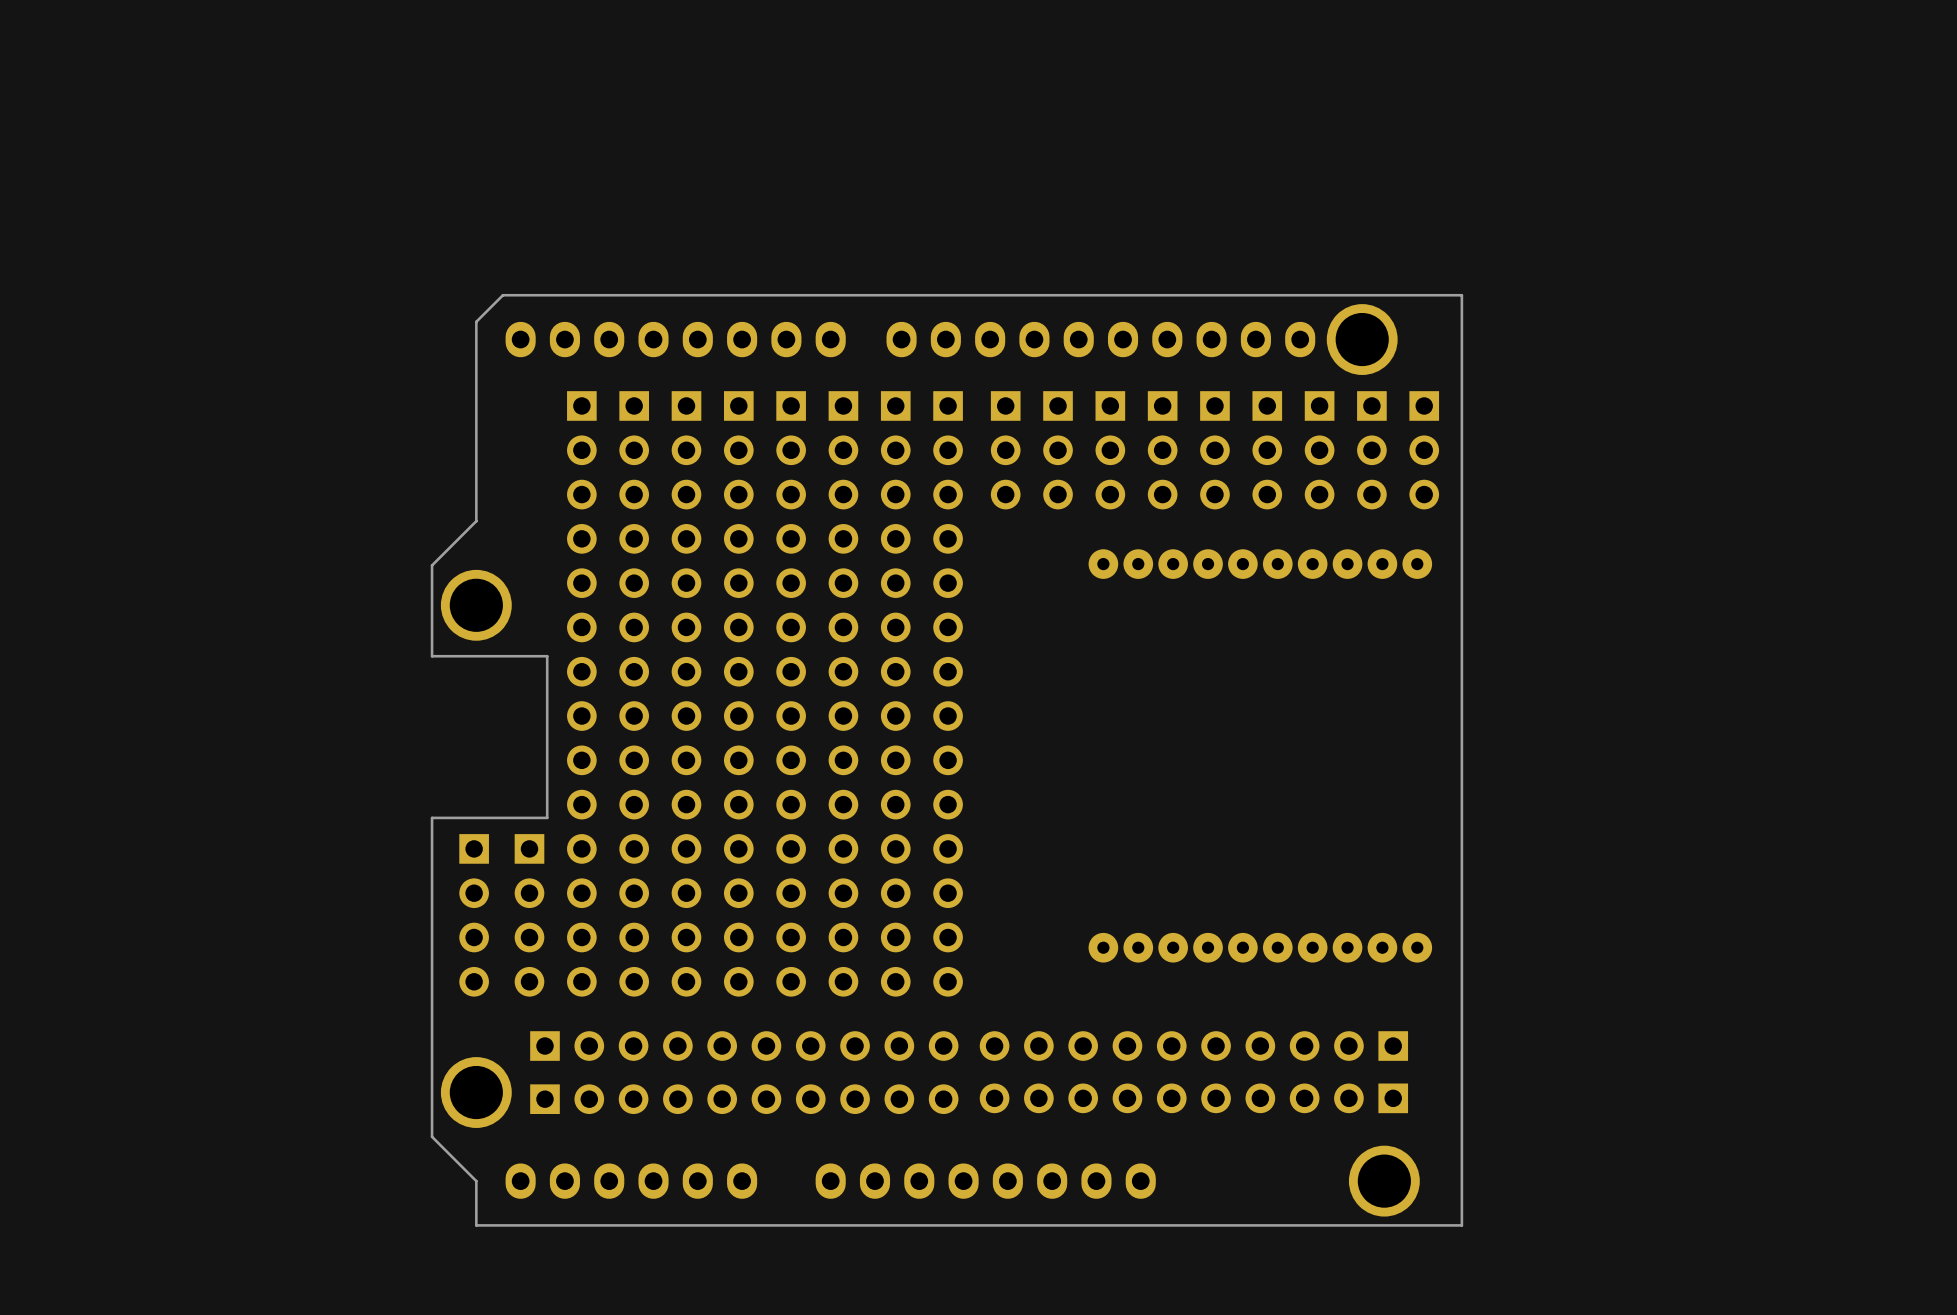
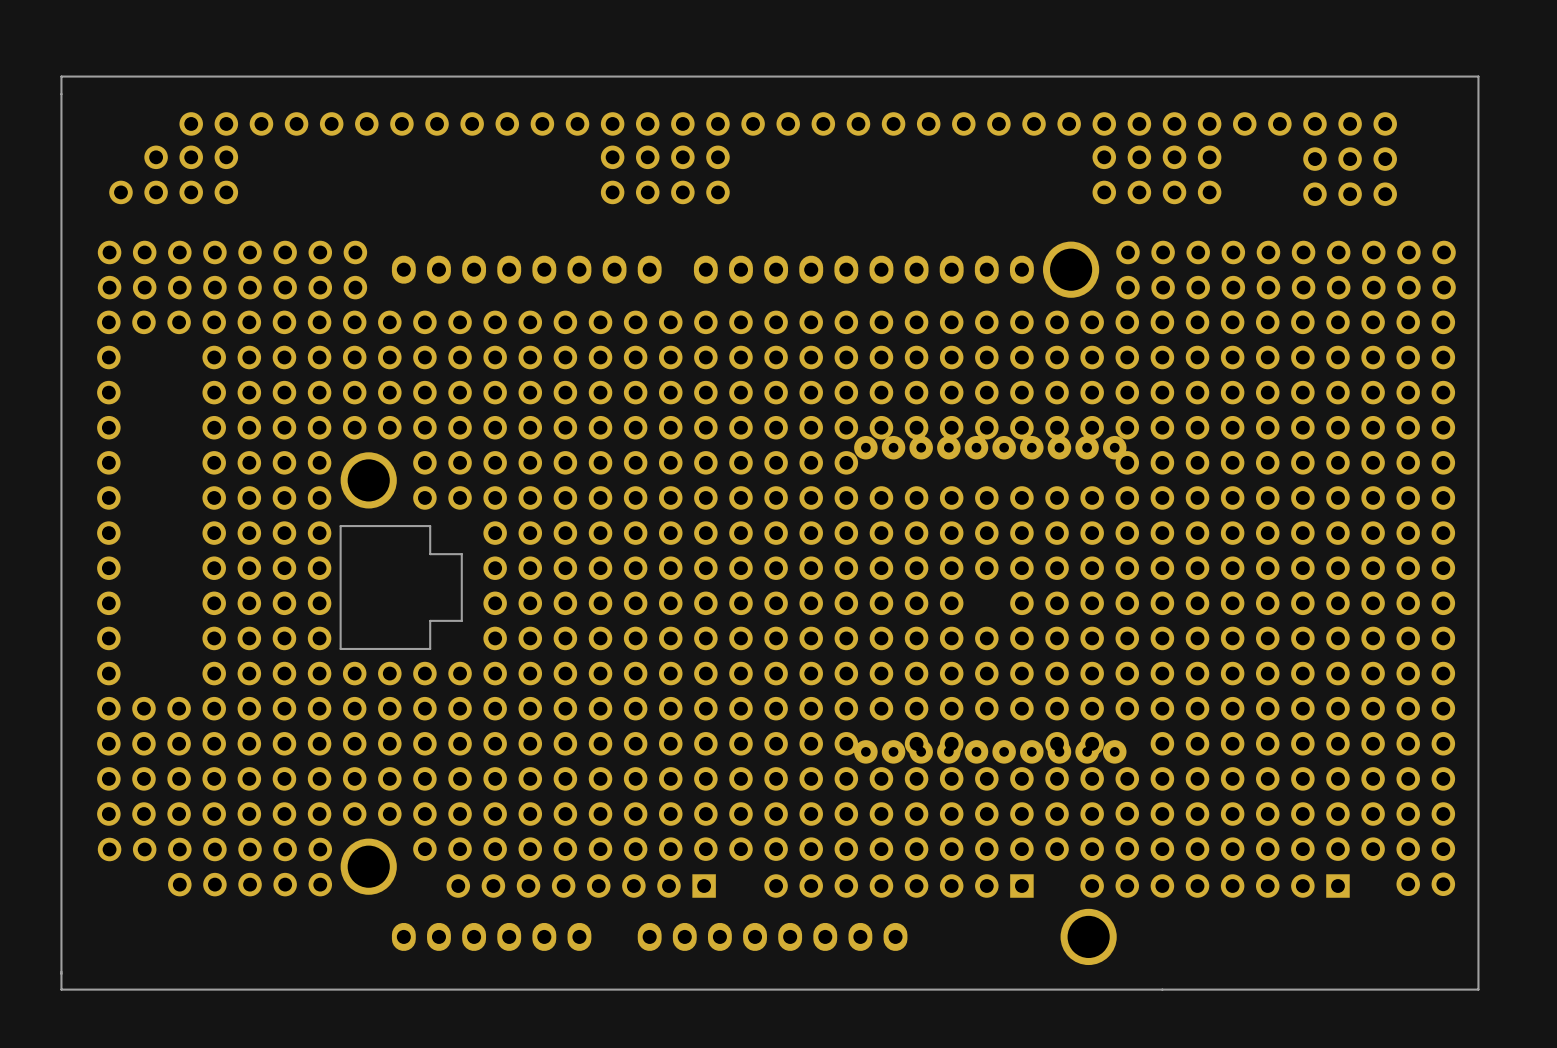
board edge: none -> (1478, 76) (1478, 989) (61, 989) (61, 76) (1478, 76)
part: none -> (191, 123)
part: none -> (226, 123)
part: none -> (261, 123)
part: none -> (296, 123)
part: none -> (331, 123)
part: none -> (366, 123)
part: none -> (401, 123)
part: none -> (437, 123)
part: none -> (472, 123)
part: none -> (507, 123)
part: none -> (542, 123)
part: none -> (577, 123)
part: none -> (612, 123)
part: none -> (647, 123)
part: none -> (682, 123)
part: none -> (717, 123)
part: none -> (753, 123)
part: none -> (788, 123)
part: none -> (823, 123)
part: none -> (858, 123)
part: none -> (893, 123)
part: none -> (928, 123)
part: none -> (963, 123)
part: none -> (998, 123)
part: none -> (1034, 123)
part: none -> (1069, 123)
part: none -> (1104, 123)
part: none -> (1139, 123)
part: none -> (1174, 123)
part: none -> (1209, 123)
part: none -> (1244, 123)
part: none -> (1279, 123)
part: none -> (1314, 123)
part: none -> (1350, 123)
part: none -> (1385, 123)
part: none -> (156, 157)
part: none -> (191, 157)
part: none -> (226, 157)
part: none -> (612, 157)
part: none -> (647, 157)
part: none -> (682, 157)
part: none -> (717, 157)
part: none -> (1104, 157)
part: none -> (1139, 157)
part: none -> (1174, 157)
part: none -> (1209, 157)
part: none -> (1314, 159)
part: none -> (1350, 159)
part: none -> (1385, 159)
part: none -> (120, 192)
part: none -> (156, 192)
part: none -> (191, 192)
part: none -> (226, 192)
part: none -> (612, 192)
part: none -> (647, 192)
part: none -> (682, 192)
part: none -> (717, 192)
part: none -> (1104, 192)
part: none -> (1139, 192)
part: none -> (1174, 192)
part: none -> (1209, 192)
part: none -> (1314, 194)
part: none -> (1350, 194)
part: none -> (1385, 194)
part: none -> (109, 252)
part: none -> (144, 252)
part: none -> (179, 252)
part: none -> (214, 252)
part: none -> (250, 252)
part: none -> (285, 252)
part: none -> (320, 252)
part: none -> (355, 252)
part: none -> (1127, 252)
part: none -> (1163, 252)
part: none -> (1198, 252)
part: none -> (1233, 252)
part: none -> (1268, 252)
part: none -> (1303, 252)
part: none -> (1338, 252)
part: none -> (1373, 252)
part: none -> (1408, 252)
part: none -> (1444, 252)
part: none -> (109, 287)
part: none -> (144, 287)
part: none -> (179, 287)
part: none -> (214, 287)
part: none -> (250, 287)
part: none -> (285, 287)
part: none -> (320, 287)
part: none -> (355, 287)
part: none -> (1127, 287)
part: none -> (1163, 287)
part: none -> (1198, 287)
part: none -> (1233, 287)
part: none -> (1268, 287)
part: none -> (1303, 287)
part: none -> (1338, 287)
part: none -> (1373, 287)
part: none -> (1408, 287)
part: none -> (1444, 287)
part footprint: [1095, 391, 1126, 510] -> [869, 345, 894, 370]
part footprint: [1147, 391, 1178, 510] -> [904, 345, 929, 370]
part footprint: [1200, 391, 1230, 510] -> [939, 345, 964, 370]
part footprint: [1252, 391, 1283, 510] -> [975, 345, 999, 370]
part footprint: [1409, 391, 1440, 510] -> [1115, 345, 1140, 370]
part: none -> (108, 322)
part: none -> (143, 322)
part: none -> (179, 322)
part: none -> (214, 322)
part: none -> (249, 322)
part: none -> (284, 322)
part: none -> (319, 322)
part: none -> (354, 322)
part: none -> (389, 322)
part: none -> (424, 322)
part: none -> (460, 322)
part: none -> (495, 322)
part: none -> (530, 322)
part: none -> (565, 322)
part: none -> (600, 322)
part: none -> (635, 322)
part: none -> (670, 322)
part: none -> (705, 322)
part: none -> (740, 322)
part: none -> (776, 322)
part: none -> (811, 322)
part: none -> (846, 322)
part: none -> (881, 322)
part: none -> (916, 322)
part: none -> (951, 322)
part: none -> (986, 322)
part: none -> (1021, 322)
part: none -> (1057, 322)
part: none -> (1092, 322)
part: none -> (1127, 322)
part: none -> (1162, 322)
part: none -> (1197, 322)
part: none -> (1232, 322)
part: none -> (1267, 322)
part: none -> (1302, 322)
part: none -> (1337, 322)
part: none -> (1373, 322)
part: none -> (1408, 322)
part: none -> (1443, 322)
part: none -> (108, 357)
part: none -> (214, 357)
part: none -> (249, 357)
part: none -> (284, 357)
part: none -> (319, 357)
part: none -> (354, 357)
part: none -> (389, 357)
part: none -> (424, 357)
part: none -> (460, 357)
part: none -> (495, 357)
part: none -> (530, 357)
part: none -> (565, 357)
part: none -> (600, 357)
part: none -> (635, 357)
part: none -> (670, 357)
part: none -> (705, 357)
part: none -> (740, 357)
part: none -> (776, 357)
part: (1005, 450) -> none
part: none -> (811, 357)
part: (1058, 450) -> none
part: none -> (846, 357)
part: none -> (1021, 357)
part: (1319, 450) -> none
part: none -> (1057, 357)
part: (1371, 450) -> none
part: none -> (1092, 357)
part: none -> (1162, 357)
part: none -> (1197, 357)
part: none -> (1232, 357)
part: none -> (1267, 357)
part: none -> (1302, 357)
part: none -> (1337, 357)
part: none -> (1373, 357)
part: none -> (1408, 357)
part: none -> (1443, 357)
part: none -> (108, 392)
part: none -> (214, 392)
part: none -> (249, 392)
part: none -> (284, 392)
part: none -> (319, 392)
part: none -> (354, 392)
part: none -> (389, 392)
part: none -> (424, 392)
part: none -> (460, 392)
part: none -> (495, 392)
part: none -> (530, 392)
part: none -> (565, 392)
part: none -> (600, 392)
part: none -> (635, 392)
part: none -> (670, 392)
part: none -> (705, 392)
part: none -> (740, 392)
part: none -> (776, 392)
part: none -> (811, 392)
part: none -> (846, 392)
part: none -> (881, 392)
part: none -> (916, 392)
part: none -> (951, 392)
part: none -> (986, 392)
part: none -> (1021, 392)
part: none -> (1057, 392)
part: none -> (1092, 392)
part: none -> (1127, 392)
part: none -> (1162, 392)
part: none -> (1197, 392)
part: none -> (1232, 392)
part: none -> (1267, 392)
part: none -> (1302, 392)
part: none -> (1337, 392)
part: none -> (1373, 392)
part: none -> (1408, 392)
part: none -> (1443, 392)
part: none -> (108, 427)
part: none -> (214, 427)
part: none -> (249, 427)
part: none -> (284, 427)
part: none -> (319, 427)
part: none -> (354, 427)
part: none -> (389, 427)
part: none -> (424, 427)
part: none -> (460, 427)
part: none -> (495, 427)
part: none -> (530, 427)
part: none -> (565, 427)
part: none -> (600, 427)
part: none -> (635, 427)
part: none -> (670, 427)
part: none -> (705, 427)
part: none -> (740, 427)
part: none -> (776, 427)
part: none -> (811, 427)
part: none -> (846, 427)
part: none -> (881, 427)
part: none -> (916, 427)
part: none -> (951, 427)
part: none -> (986, 427)
part: none -> (1021, 427)
part: none -> (1057, 427)
part: none -> (1092, 427)
part: none -> (1127, 427)
part: none -> (1162, 427)
part: none -> (1197, 427)
part: none -> (1232, 427)
part: none -> (1267, 427)
part: none -> (1302, 427)
part: none -> (1337, 427)
part: none -> (1373, 427)
part: none -> (1408, 427)
part: none -> (1443, 427)
part: none -> (108, 462)
part: none -> (214, 462)
part: none -> (249, 462)
part: none -> (284, 462)
part: none -> (319, 462)
part: none -> (424, 462)
part: none -> (460, 462)
part: none -> (495, 462)
part: none -> (530, 462)
part: none -> (565, 462)
part: none -> (600, 462)
part: none -> (635, 462)
part: none -> (670, 462)
part: none -> (705, 462)
part: none -> (740, 462)
part: none -> (776, 462)
part: none -> (811, 462)
part: none -> (846, 462)
part: none -> (1127, 462)
part: none -> (1162, 462)
part: none -> (1197, 462)
part: none -> (1232, 462)
part: none -> (1267, 462)
part: none -> (1302, 462)
part: none -> (1337, 462)
part: none -> (1373, 462)
part: none -> (1408, 462)
part: none -> (1443, 462)
part: none -> (108, 497)
part: none -> (214, 497)
part: none -> (249, 497)
part: none -> (284, 497)
part: none -> (319, 497)
part: none -> (424, 497)
part: none -> (460, 497)
part: none -> (495, 497)
part: none -> (530, 497)
part: none -> (565, 497)
part: none -> (600, 497)
part: none -> (635, 497)
part: none -> (670, 497)
part: none -> (705, 497)
part: none -> (740, 497)
part: none -> (776, 497)
part: none -> (811, 497)
part: none -> (846, 497)
part: none -> (881, 497)
part: none -> (916, 497)
part: none -> (951, 497)
part: none -> (986, 497)
part: none -> (1021, 497)
part: none -> (1057, 497)
part: none -> (1092, 497)
part: none -> (1127, 497)
part: none -> (1162, 497)
part: none -> (1197, 497)
part: none -> (1232, 497)
part: none -> (1267, 497)
part: none -> (1302, 497)
part: none -> (1337, 497)
part: none -> (1373, 497)
part: none -> (1408, 497)
part: none -> (1443, 497)
part: none -> (108, 533)
part: none -> (214, 533)
part: none -> (249, 533)
part: none -> (284, 533)
part: none -> (319, 533)
part: none -> (495, 533)
part: none -> (530, 533)
part: none -> (565, 533)
part: none -> (600, 533)
part: none -> (635, 533)
part: none -> (670, 533)
part: none -> (705, 533)
part: none -> (740, 533)
part: none -> (776, 533)
part: none -> (811, 533)
part: none -> (846, 533)
part: none -> (881, 533)
part: none -> (916, 533)
part: none -> (951, 533)
part: none -> (986, 533)
part: none -> (1021, 533)
part: none -> (1057, 533)
part: none -> (1092, 533)
part: none -> (1127, 533)
part: none -> (1162, 533)
part: none -> (1197, 533)
part: none -> (1232, 533)
part: none -> (1267, 533)
part: none -> (1302, 533)
part: none -> (1337, 533)
part: none -> (1373, 533)
part: none -> (1408, 533)
part: none -> (1443, 533)
part: (581, 693) -> none
part: (634, 693) -> none
part: (686, 693) -> none
part: (738, 693) -> none
part: (791, 693) -> none
part: (843, 693) -> none
part: (895, 693) -> none
part: (948, 693) -> none
part: none -> (108, 568)
part: none -> (214, 568)
part: none -> (249, 568)
part: none -> (284, 568)
part: none -> (319, 568)
part: none -> (495, 568)
part: none -> (530, 568)
part: none -> (565, 568)
part: none -> (600, 568)
part: none -> (635, 568)
part: none -> (670, 568)
part: none -> (705, 568)
part: none -> (740, 568)
part: none -> (776, 568)
part: none -> (811, 568)
part: none -> (846, 568)
part: none -> (881, 568)
part: none -> (916, 568)
part: none -> (951, 568)
part: none -> (986, 568)
part: none -> (1021, 568)
part: none -> (1057, 568)
part: none -> (1092, 568)
part: none -> (1127, 568)
part: none -> (1162, 568)
part: none -> (1197, 568)
part: none -> (1232, 568)
part: none -> (1267, 568)
part: none -> (1302, 568)
part: none -> (1337, 568)
part: none -> (1373, 568)
part: none -> (1408, 568)
part: none -> (1443, 568)
part: none -> (108, 603)
part: none -> (214, 603)
part: none -> (249, 603)
part: none -> (284, 603)
part: none -> (319, 603)
part: none -> (495, 603)
part: none -> (530, 603)
part: none -> (565, 603)
part: none -> (600, 603)
part: none -> (635, 603)
part: none -> (670, 603)
part: none -> (705, 603)
part: none -> (740, 603)
part: none -> (776, 603)
part: none -> (811, 603)
part: none -> (846, 603)
part: none -> (881, 603)
part: none -> (916, 603)
part: none -> (951, 603)
part: none -> (1021, 603)
part: none -> (1057, 603)
part: none -> (1092, 603)
part: none -> (1127, 603)
part: none -> (1162, 603)
part: none -> (1197, 603)
part: none -> (1232, 603)
part: none -> (1267, 603)
part: none -> (1302, 603)
part: none -> (1337, 603)
part: none -> (1373, 603)
part: none -> (1408, 603)
part: none -> (1443, 603)
part: none -> (108, 638)
part: none -> (214, 638)
part: none -> (249, 638)
part: none -> (284, 638)
part: none -> (319, 638)
part: none -> (495, 638)
part: none -> (530, 638)
part: none -> (565, 638)
part: none -> (600, 638)
part: none -> (635, 638)
part: none -> (670, 638)
part: none -> (705, 638)
part: none -> (740, 638)
part: none -> (776, 638)
part: none -> (811, 638)
part: none -> (846, 638)
part: none -> (881, 638)
part: none -> (916, 638)
part: none -> (951, 638)
part: none -> (986, 638)
part: none -> (1021, 638)
part: none -> (1057, 638)
part: none -> (1092, 638)
part: none -> (1127, 638)
part: none -> (1162, 638)
part: none -> (1197, 638)
part: none -> (1232, 638)
part: none -> (1267, 638)
part: none -> (1302, 638)
part: none -> (1337, 638)
part: none -> (1373, 638)
part: none -> (1408, 638)
part: none -> (1443, 638)
board edge: (547, 817) (547, 656) (432, 656) (432, 565) (476, 521) (476, 321) (502, 295) (1461, 295) (1461, 1225) (476, 1225) (476, 1181) (432, 1136) (432, 817) (440, 817) -> (424, 648) (430, 648) (430, 620) (461, 620) (461, 554) (430, 554) (430, 526) (340, 526) (340, 648)
part: none -> (108, 673)
part: none -> (214, 673)
part: none -> (249, 673)
part: none -> (284, 673)
part: none -> (319, 673)
part: none -> (354, 673)
part: none -> (389, 673)
part: none -> (424, 673)
part: none -> (460, 673)
part: none -> (495, 673)
part: none -> (530, 673)
part: none -> (565, 673)
part: none -> (600, 673)
part: none -> (635, 673)
part: none -> (670, 673)
part: none -> (705, 673)
part: none -> (740, 673)
part: none -> (776, 673)
part: none -> (811, 673)
part: none -> (846, 673)
part: none -> (881, 673)
part: none -> (916, 673)
part: none -> (951, 673)
part: none -> (986, 673)
part: none -> (1021, 673)
part: none -> (1057, 673)
part: none -> (1092, 673)
part: none -> (1127, 673)
part: none -> (1162, 673)
part: none -> (1197, 673)
part: none -> (1232, 673)
part: none -> (1267, 673)
part: none -> (1302, 673)
part: none -> (1337, 673)
part: none -> (1373, 673)
part: none -> (1408, 673)
part: none -> (1443, 673)
part: none -> (108, 708)
part: none -> (143, 708)
part: none -> (179, 708)
part: none -> (214, 708)
part: none -> (249, 708)
part: none -> (284, 708)
part: none -> (319, 708)
part: none -> (354, 708)
part: none -> (389, 708)
part: none -> (424, 708)
part: none -> (460, 708)
part: none -> (495, 708)
part: none -> (530, 708)
part: none -> (565, 708)
part: none -> (600, 708)
part: none -> (635, 708)
part: none -> (670, 708)
part: none -> (705, 708)
part: none -> (740, 708)
part: none -> (776, 708)
part: none -> (811, 708)
part: none -> (846, 708)
part: none -> (881, 708)
part: none -> (916, 708)
part: none -> (951, 708)
part: none -> (986, 708)
part: none -> (1021, 708)
part: none -> (1057, 708)
part: none -> (1092, 708)
part: none -> (1127, 708)
part: none -> (1162, 708)
part: none -> (1197, 708)
part: none -> (1232, 708)
part: none -> (1267, 708)
part: none -> (1302, 708)
part: none -> (1337, 708)
part: none -> (1373, 708)
part: none -> (1408, 708)
part: none -> (1443, 708)
part: (474, 915) -> none
part: (529, 915) -> none
part: none -> (108, 743)
part: none -> (143, 743)
part: none -> (179, 743)
part: none -> (214, 743)
part: none -> (249, 743)
part: none -> (284, 743)
part: none -> (319, 743)
part: none -> (354, 743)
part: none -> (389, 743)
part: none -> (424, 743)
part: none -> (460, 743)
part: none -> (495, 743)
part: none -> (530, 743)
part: none -> (565, 743)
part: none -> (600, 743)
part: none -> (635, 743)
part: none -> (670, 743)
part: none -> (705, 743)
part: none -> (740, 743)
part: none -> (776, 743)
part: none -> (811, 743)
part: none -> (846, 743)
part: none -> (916, 743)
part: none -> (951, 743)
part: none -> (1057, 743)
part: none -> (1092, 743)
part: none -> (1162, 743)
part: none -> (1197, 743)
part: none -> (1232, 743)
part: none -> (1267, 743)
part: none -> (1302, 743)
part: none -> (1337, 743)
part: none -> (1373, 743)
part: none -> (1408, 743)
part: none -> (1443, 743)
part: none -> (108, 778)
part: none -> (143, 778)
part: none -> (179, 778)
part: none -> (214, 778)
part: none -> (249, 778)
part: none -> (284, 778)
part: none -> (319, 778)
part: none -> (354, 778)
part: none -> (389, 778)
part: none -> (424, 778)
part: none -> (460, 778)
part: none -> (495, 778)
part: none -> (530, 778)
part: none -> (565, 778)
part: none -> (600, 778)
part: none -> (635, 778)
part: none -> (670, 778)
part: none -> (705, 778)
part: none -> (740, 778)
part: none -> (776, 778)
part: none -> (811, 778)
part: none -> (846, 778)
part: none -> (881, 778)
part: none -> (916, 778)
part: none -> (951, 778)
part: none -> (986, 778)
part: none -> (1021, 778)
part: none -> (1057, 778)
part: none -> (1092, 778)
part: none -> (1127, 778)
part: none -> (1162, 778)
part: none -> (1197, 778)
part: none -> (1232, 778)
part: none -> (1267, 778)
part: none -> (1302, 778)
part: none -> (1337, 778)
part: none -> (1373, 778)
part: none -> (1408, 778)
part: none -> (1443, 778)
part: none -> (1127, 813)
part: none -> (108, 814)
part: none -> (143, 814)
part: none -> (179, 814)
part: none -> (214, 814)
part: none -> (249, 814)
part: none -> (284, 814)
part: none -> (319, 814)
part: none -> (354, 814)
part: none -> (389, 814)
part: none -> (424, 814)
part: none -> (460, 814)
part: none -> (495, 814)
part: none -> (530, 814)
part: none -> (565, 814)
part: none -> (600, 814)
part: none -> (635, 814)
part: none -> (670, 814)
part: none -> (705, 814)
part: none -> (740, 814)
part: none -> (776, 814)
part: none -> (811, 814)
part: none -> (846, 814)
part: none -> (881, 814)
part: none -> (916, 814)
part: none -> (951, 814)
part: none -> (986, 814)
part: none -> (1021, 814)
part: none -> (1057, 814)
part: none -> (1092, 814)
part: none -> (1162, 814)
part: none -> (1197, 814)
part: none -> (1232, 814)
part: none -> (1267, 814)
part: none -> (1302, 814)
part: none -> (1337, 814)
part: none -> (1373, 814)
part: none -> (1408, 814)
part: none -> (1443, 814)
part: (744, 1046) -> none
part: (1193, 1046) -> none
part: none -> (1127, 848)
part: none -> (109, 849)
part: none -> (144, 849)
part: none -> (179, 849)
part: none -> (214, 849)
part: none -> (250, 849)
part: none -> (285, 849)
part: none -> (320, 849)
part: none -> (424, 849)
part: none -> (460, 849)
part: none -> (495, 849)
part: none -> (530, 849)
part: none -> (565, 849)
part: none -> (600, 849)
part: none -> (635, 849)
part: none -> (670, 849)
part: none -> (705, 849)
part: none -> (740, 849)
part: none -> (776, 849)
part: none -> (811, 849)
part: none -> (846, 849)
part: none -> (881, 849)
part: none -> (916, 849)
part: none -> (951, 849)
part: none -> (986, 849)
part: none -> (1021, 849)
part: none -> (1057, 849)
part: none -> (1092, 849)
part: none -> (1162, 849)
part: none -> (1197, 849)
part: none -> (1232, 849)
part: none -> (1267, 849)
part: none -> (1302, 849)
part: none -> (1337, 849)
part: none -> (1373, 849)
part: none -> (1408, 849)
part: none -> (1443, 849)
part: (1193, 1098) -> none
part: (744, 1099) -> none
part: none -> (1408, 884)
part: none -> (1443, 884)
part: none -> (179, 884)
part: none -> (214, 884)
part: none -> (250, 884)
part: none -> (285, 884)
part: none -> (320, 884)
part: none -> (581, 886)
part: none -> (899, 886)
part: none -> (1215, 886)

